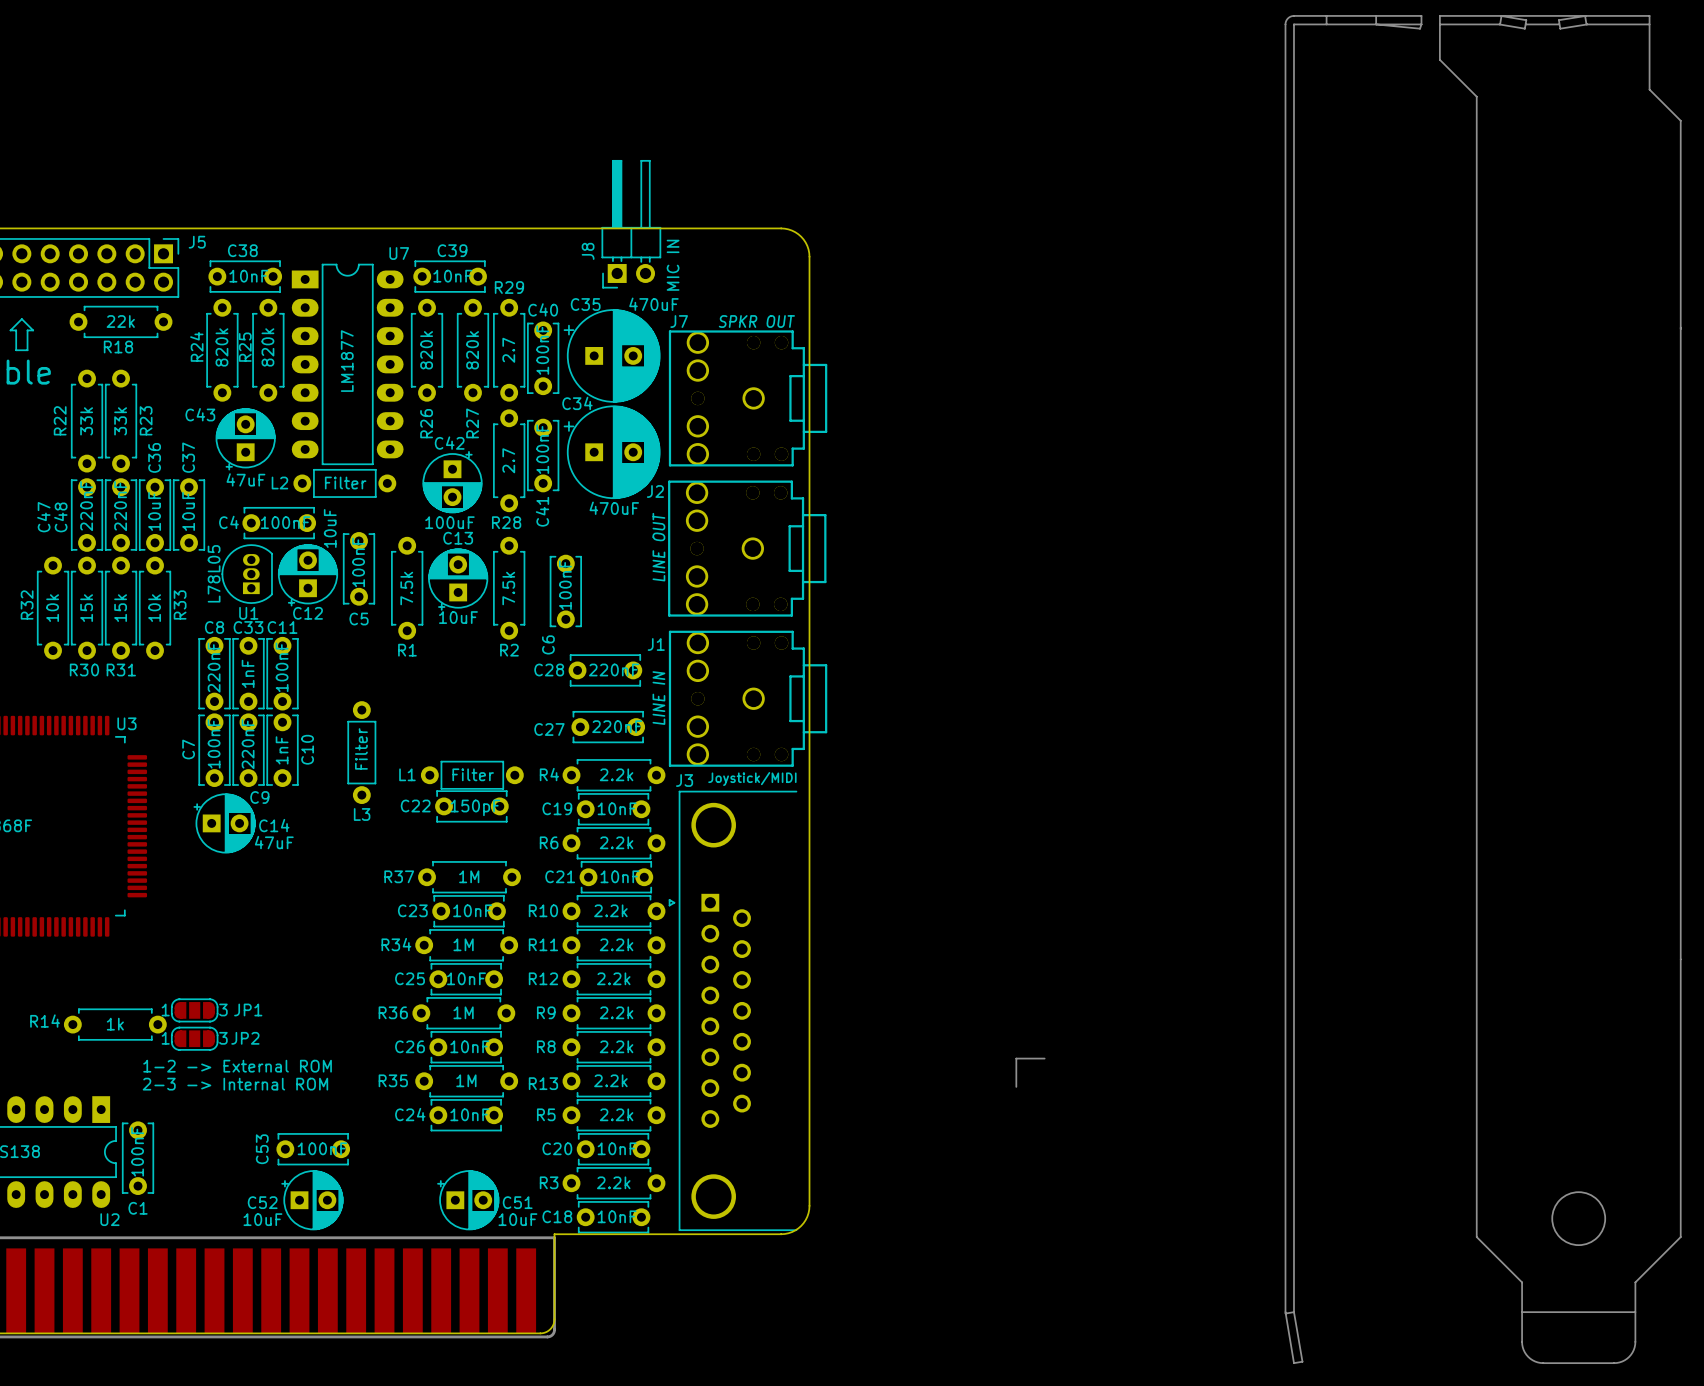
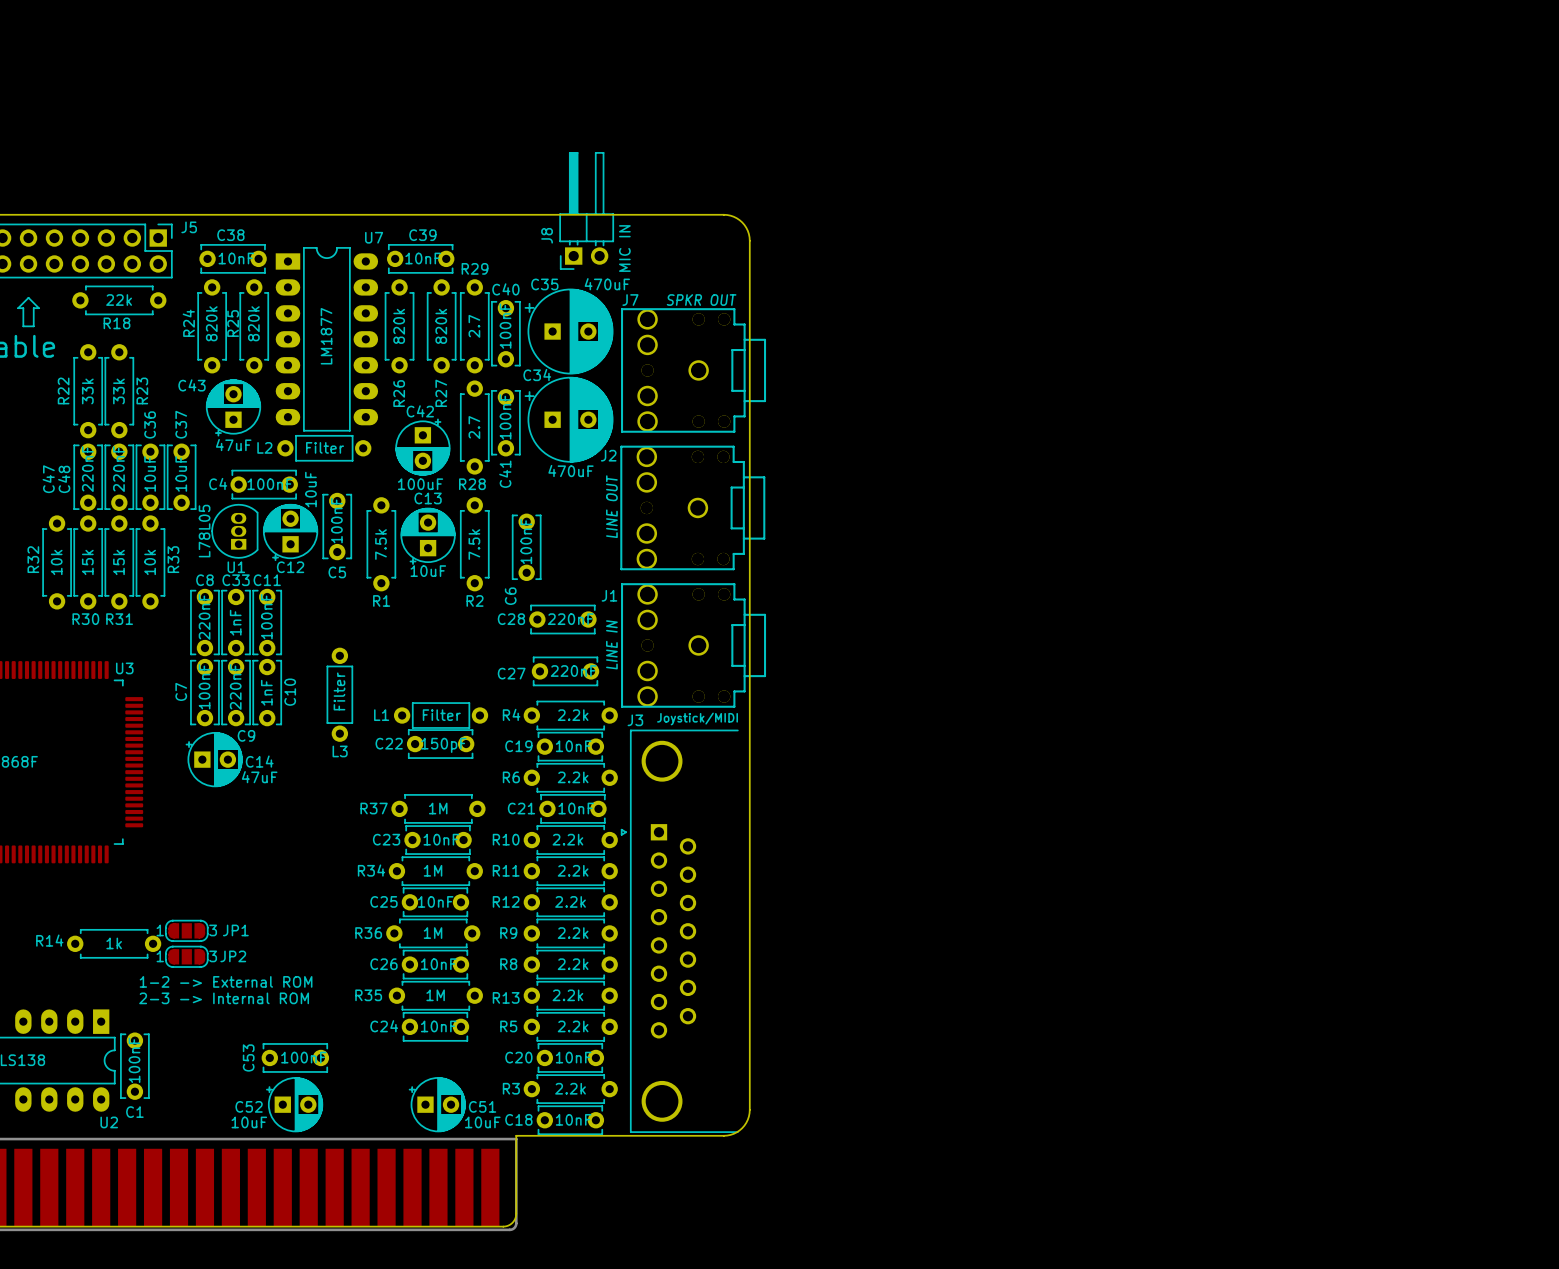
drawing: [1015, 15, 1682, 1364] -> none

